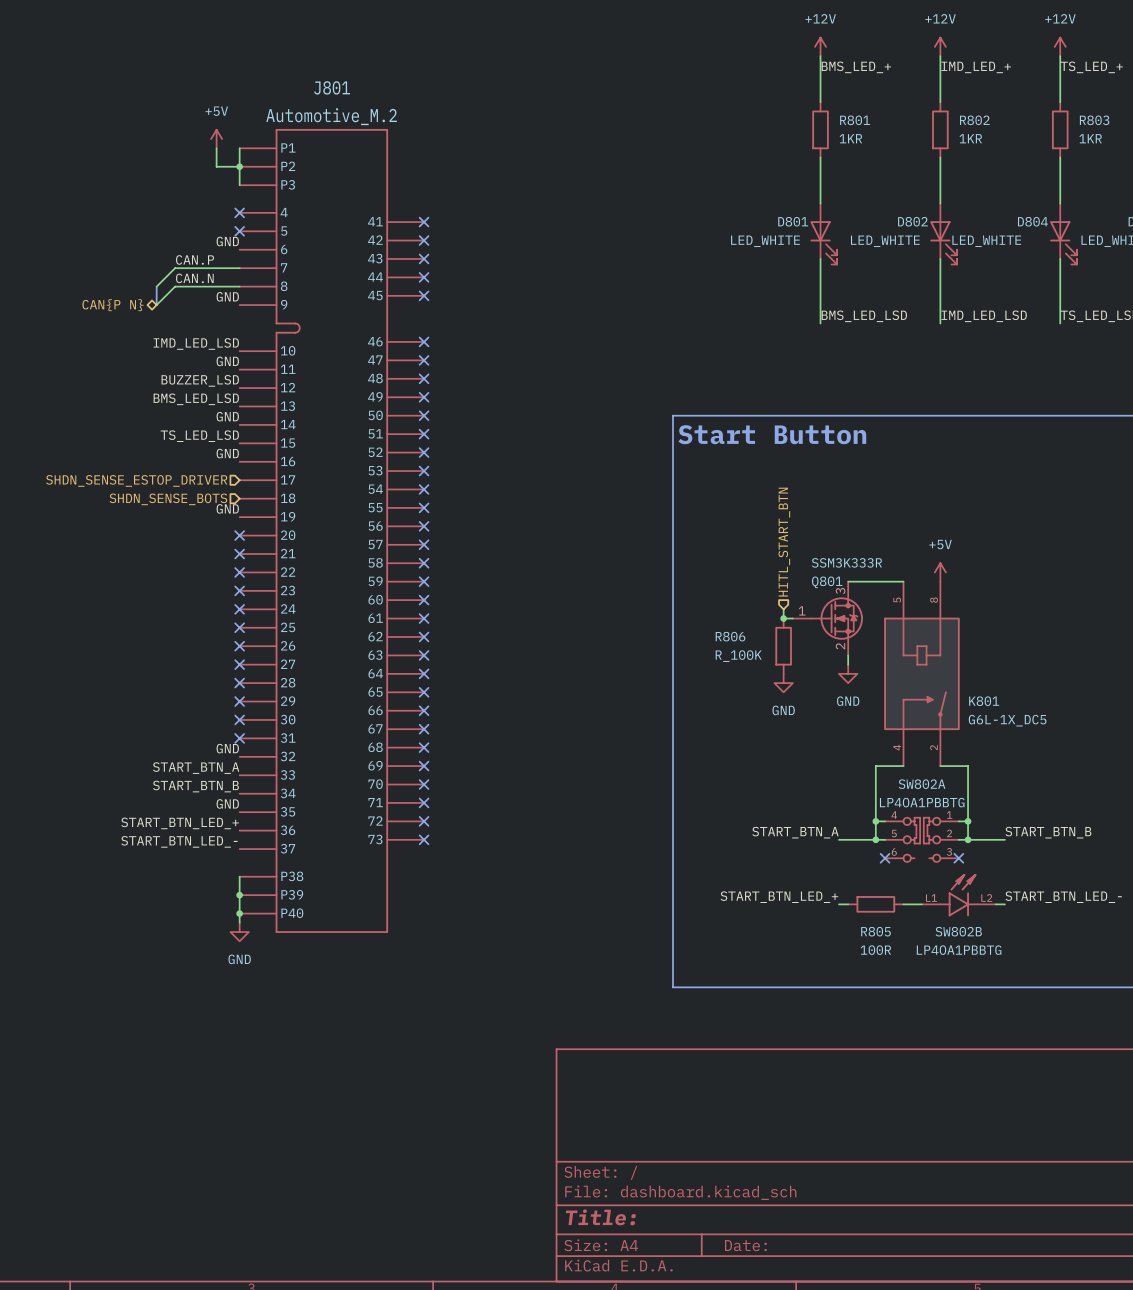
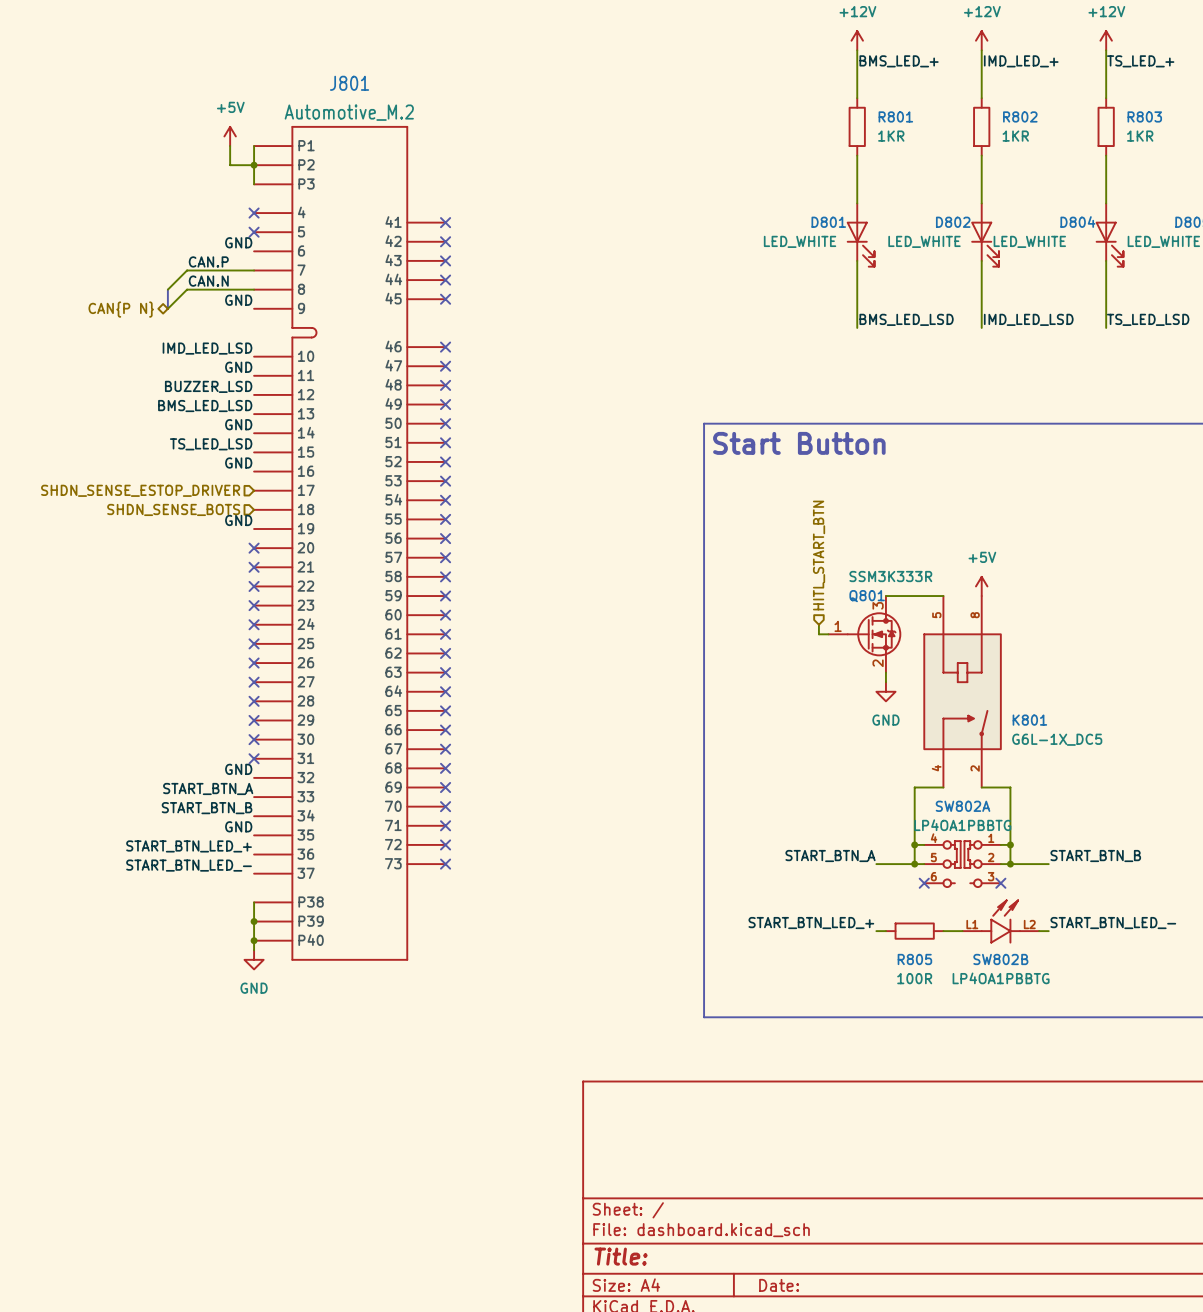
junction: (783, 618) -> none
R806: R_100K (783, 646) -> none
power symbol: GND (783, 683) -> none

